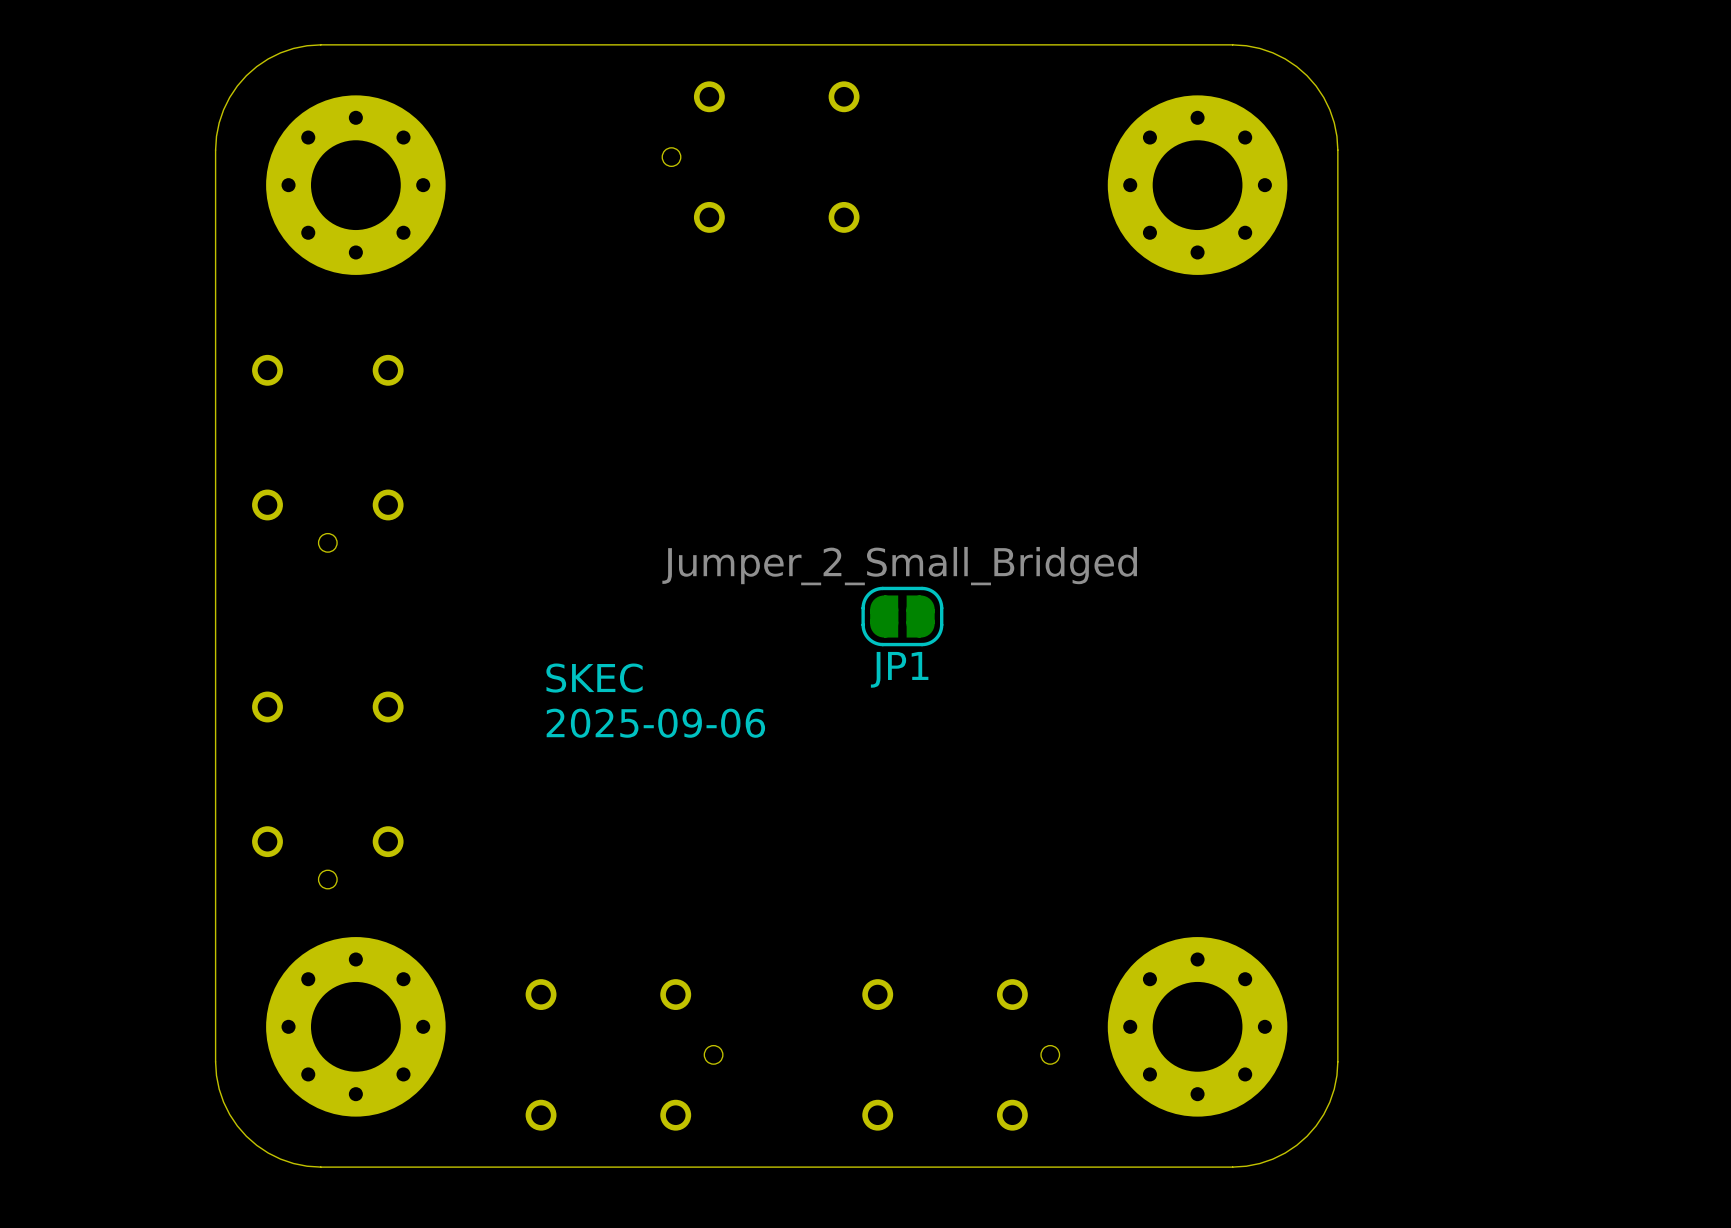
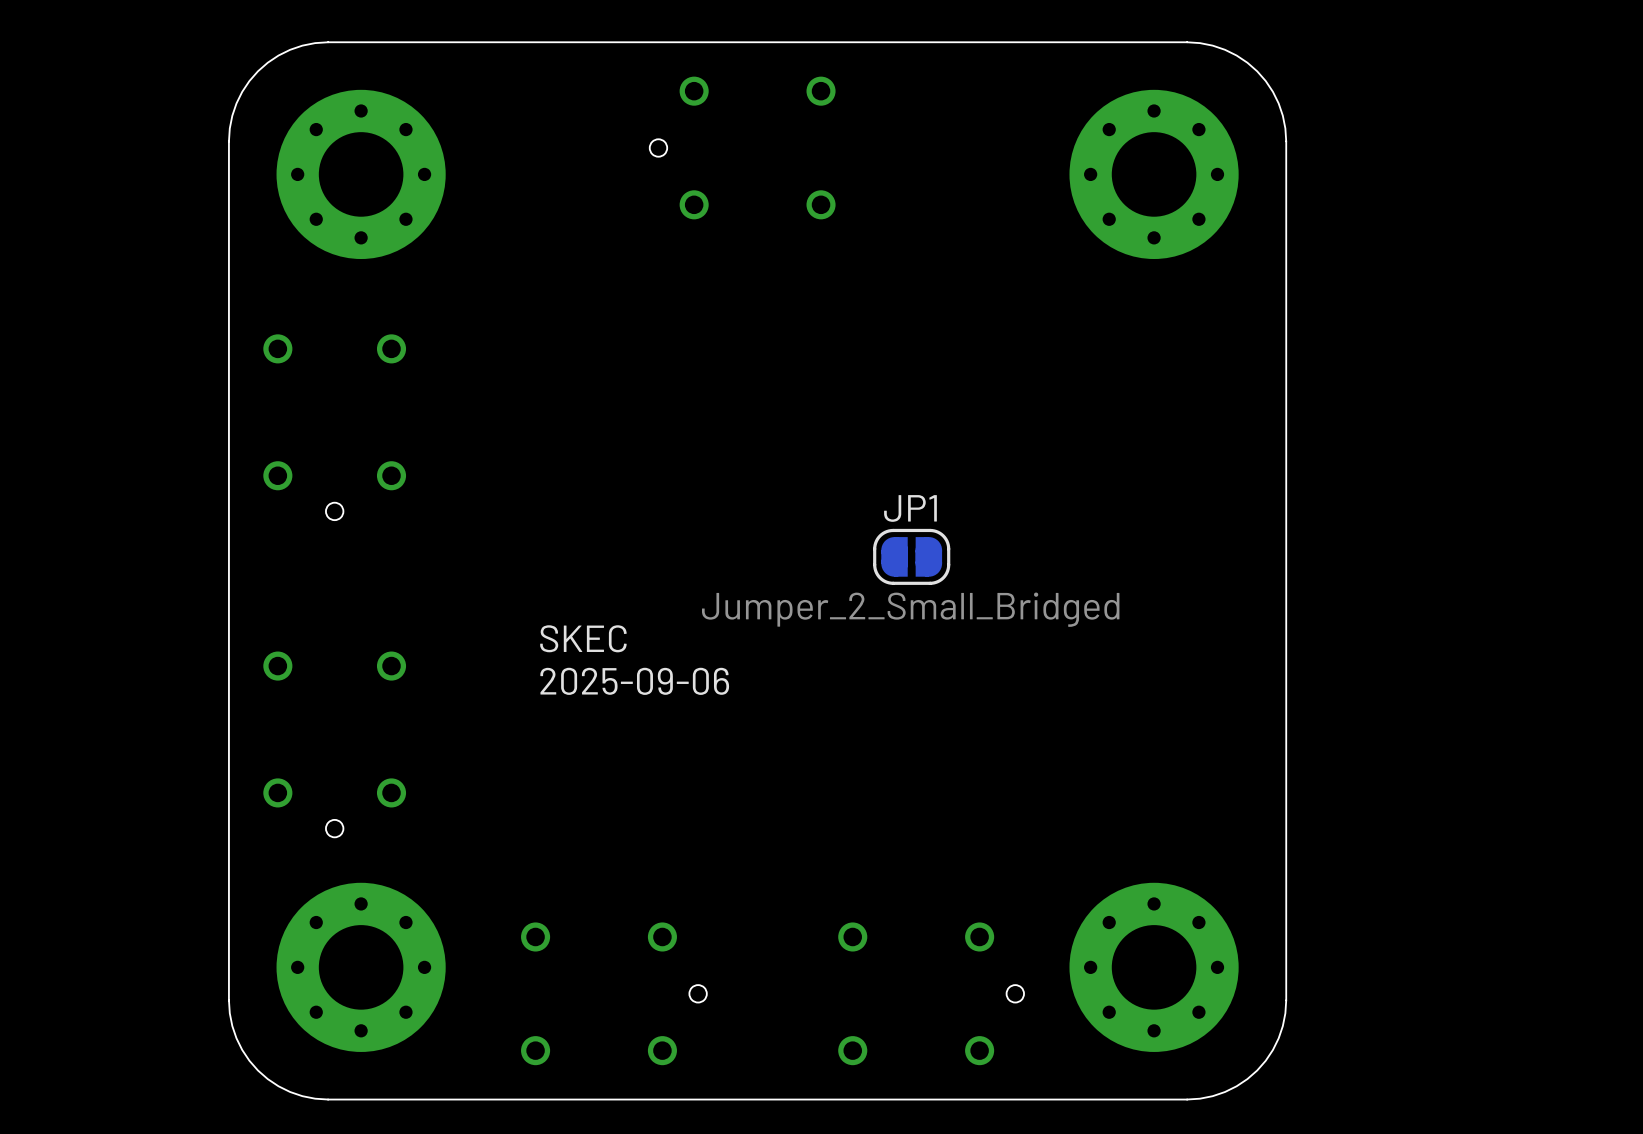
JP1 value position: Jumper_2_Small_Bridged (899, 566) -> Jumper_2_Small_Bridged (910, 609)
JP1 position: (902, 616) -> (911, 556)
JP1 name position: JP1 (899, 669) -> JP1 (910, 508)

